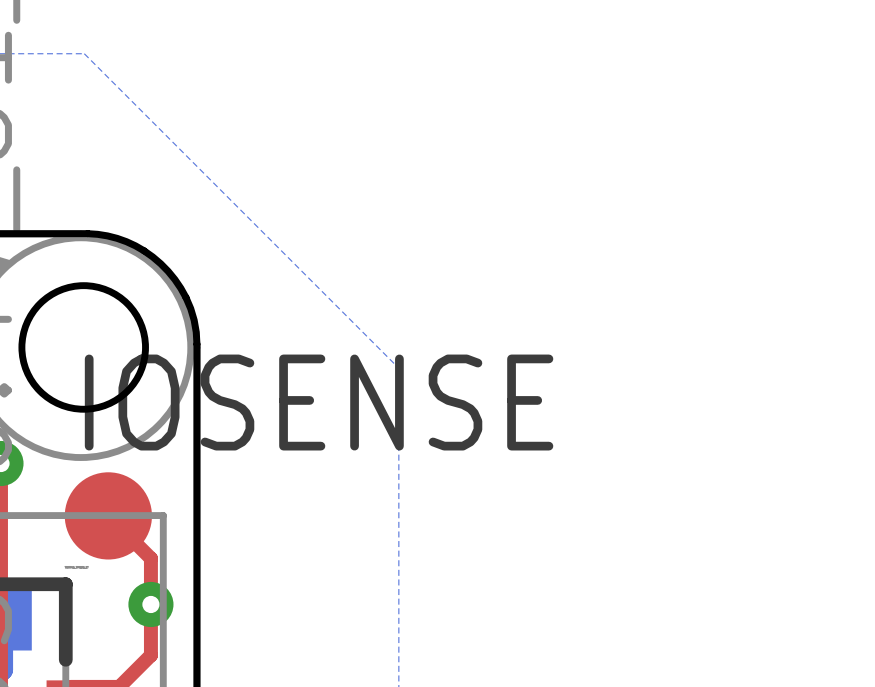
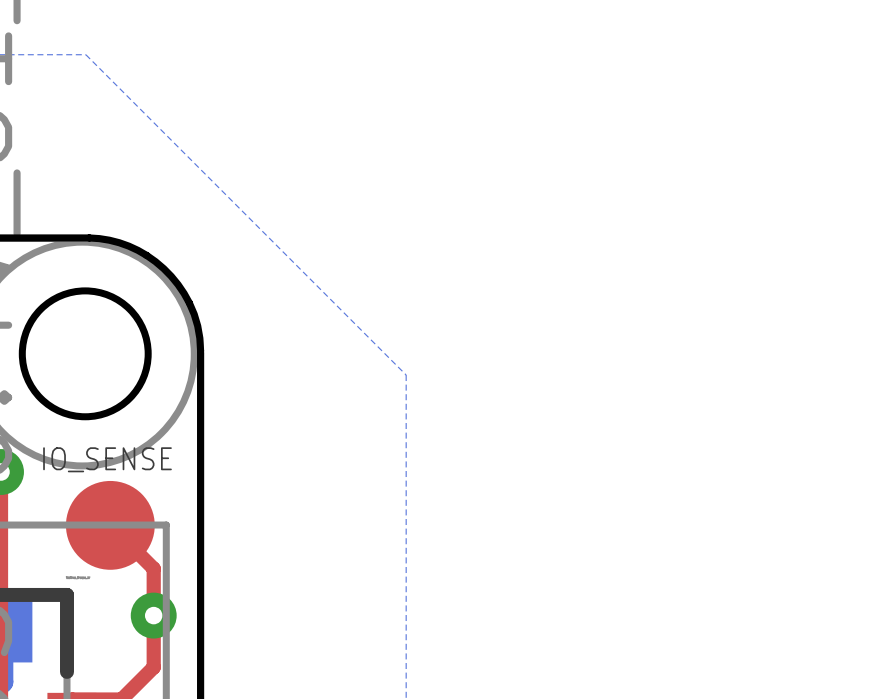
IOSENSE name: IOSENSE (319, 402) -> none
text: none -> IO_SENSE (107, 459)

